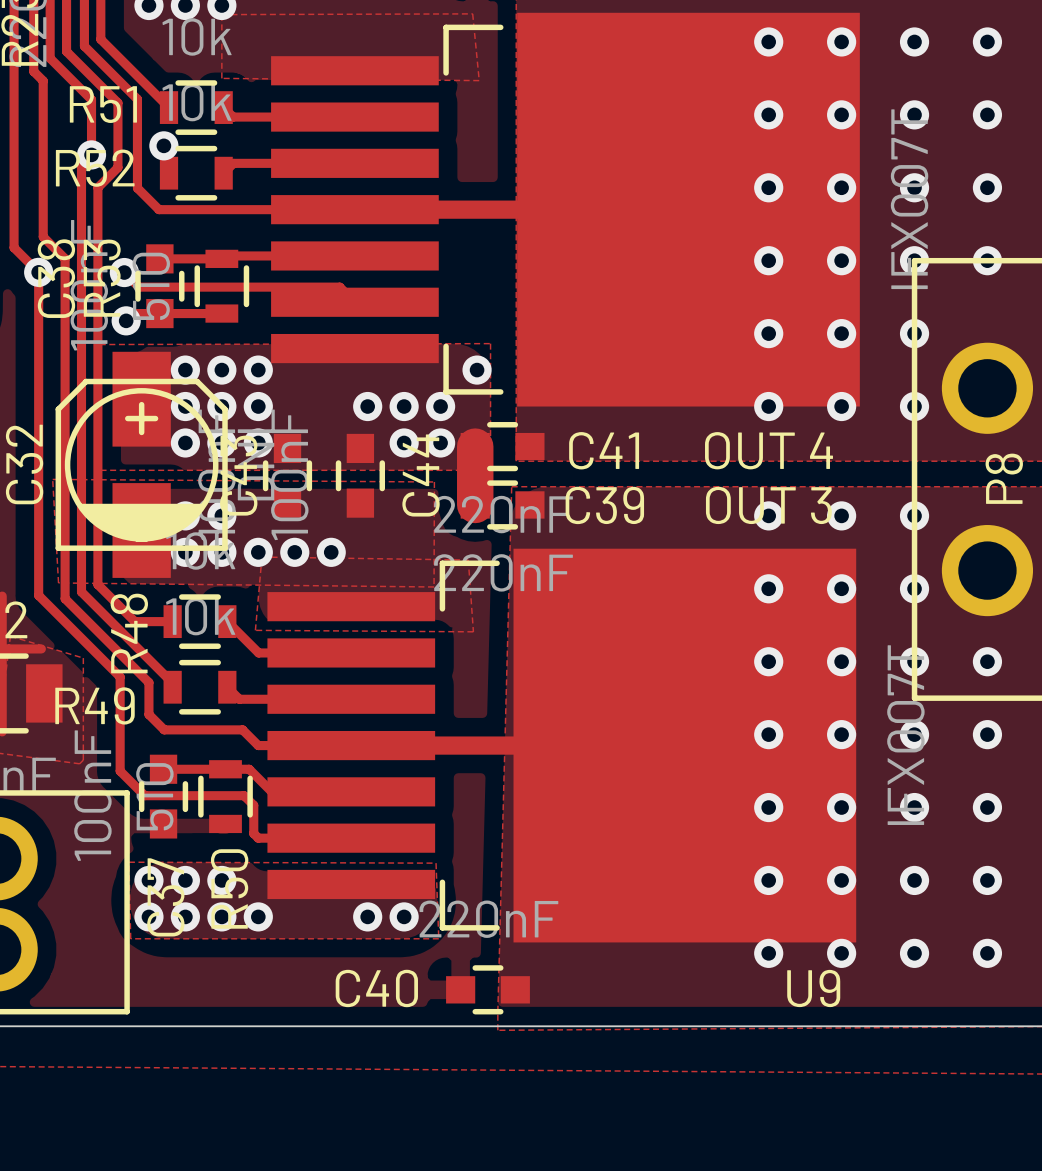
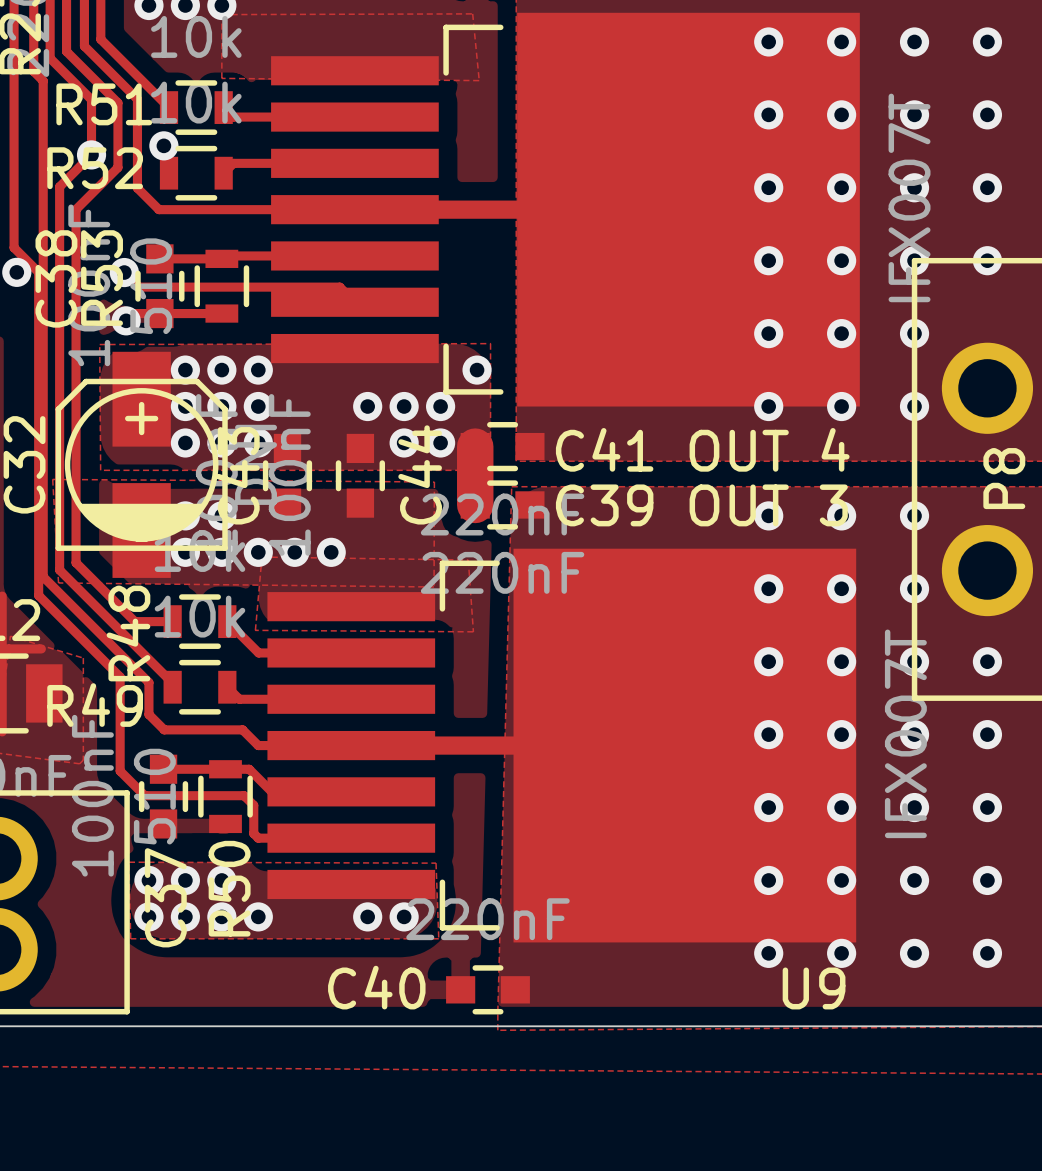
track: (81, 164) (81, 591) -> (81, 164) (59, 186) (59, 570) (81, 591)
track: (97, 187) (97, 584) -> (97, 187) (76, 209) (76, 562) (97, 584)
track: (43, 236) (65, 258) (65, 598) -> (43, 236) (43, 576) (65, 598)
via position: (38, 272) -> (16, 272)

